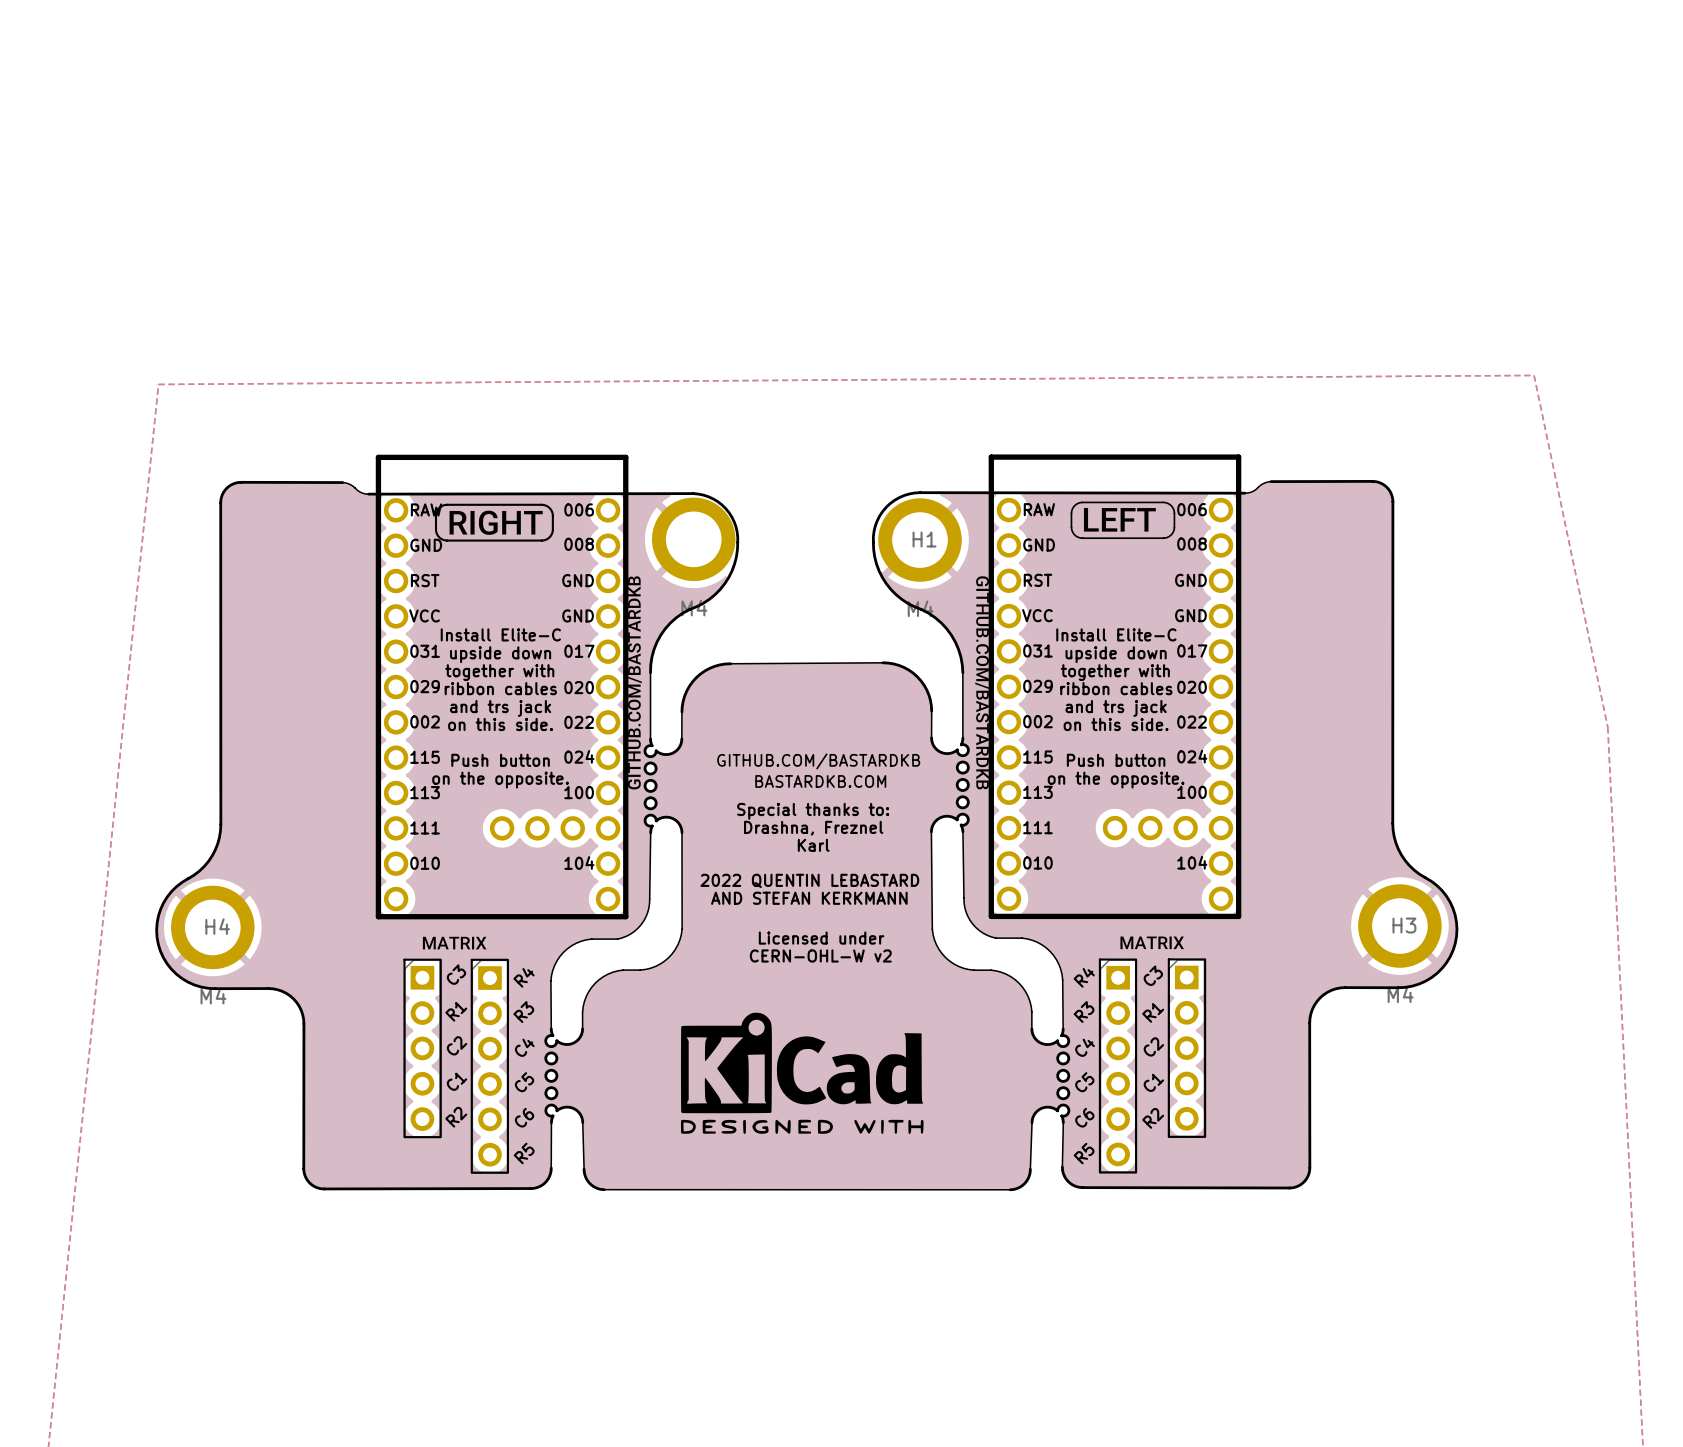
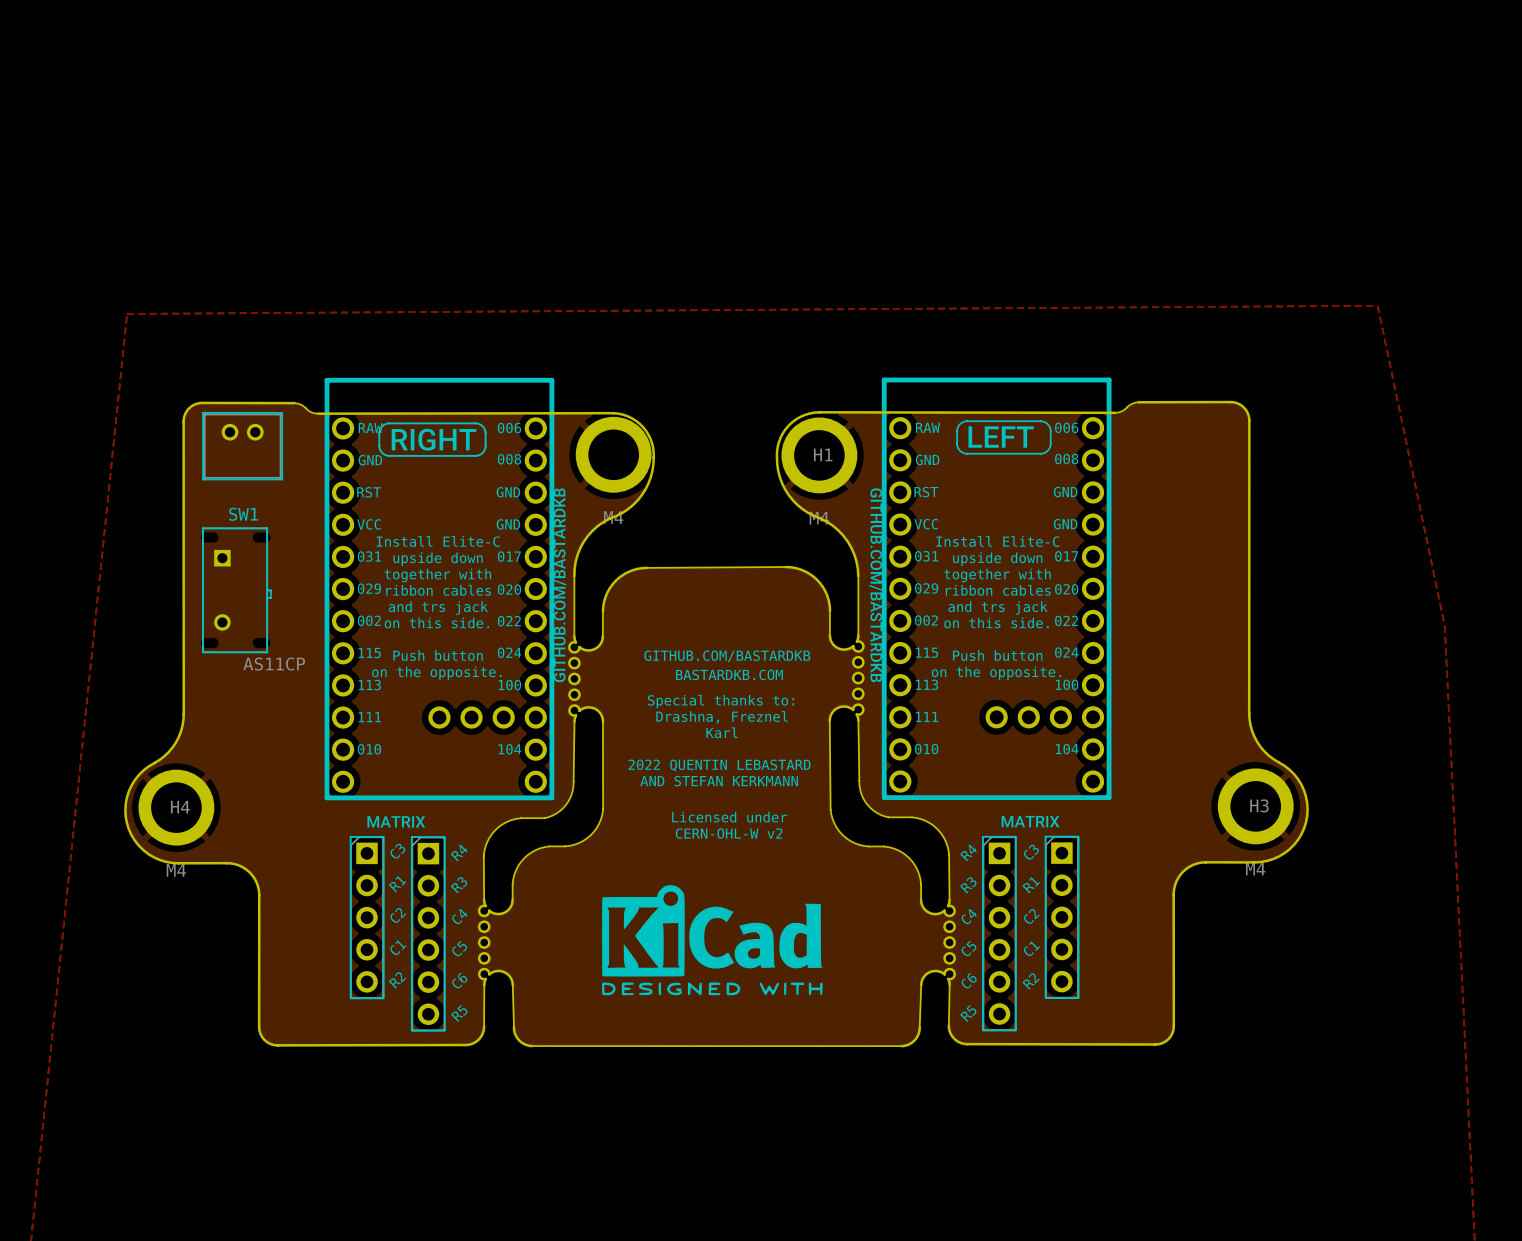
part: none -> (242, 446)
SW1: none -> AS11CP (236, 590)

